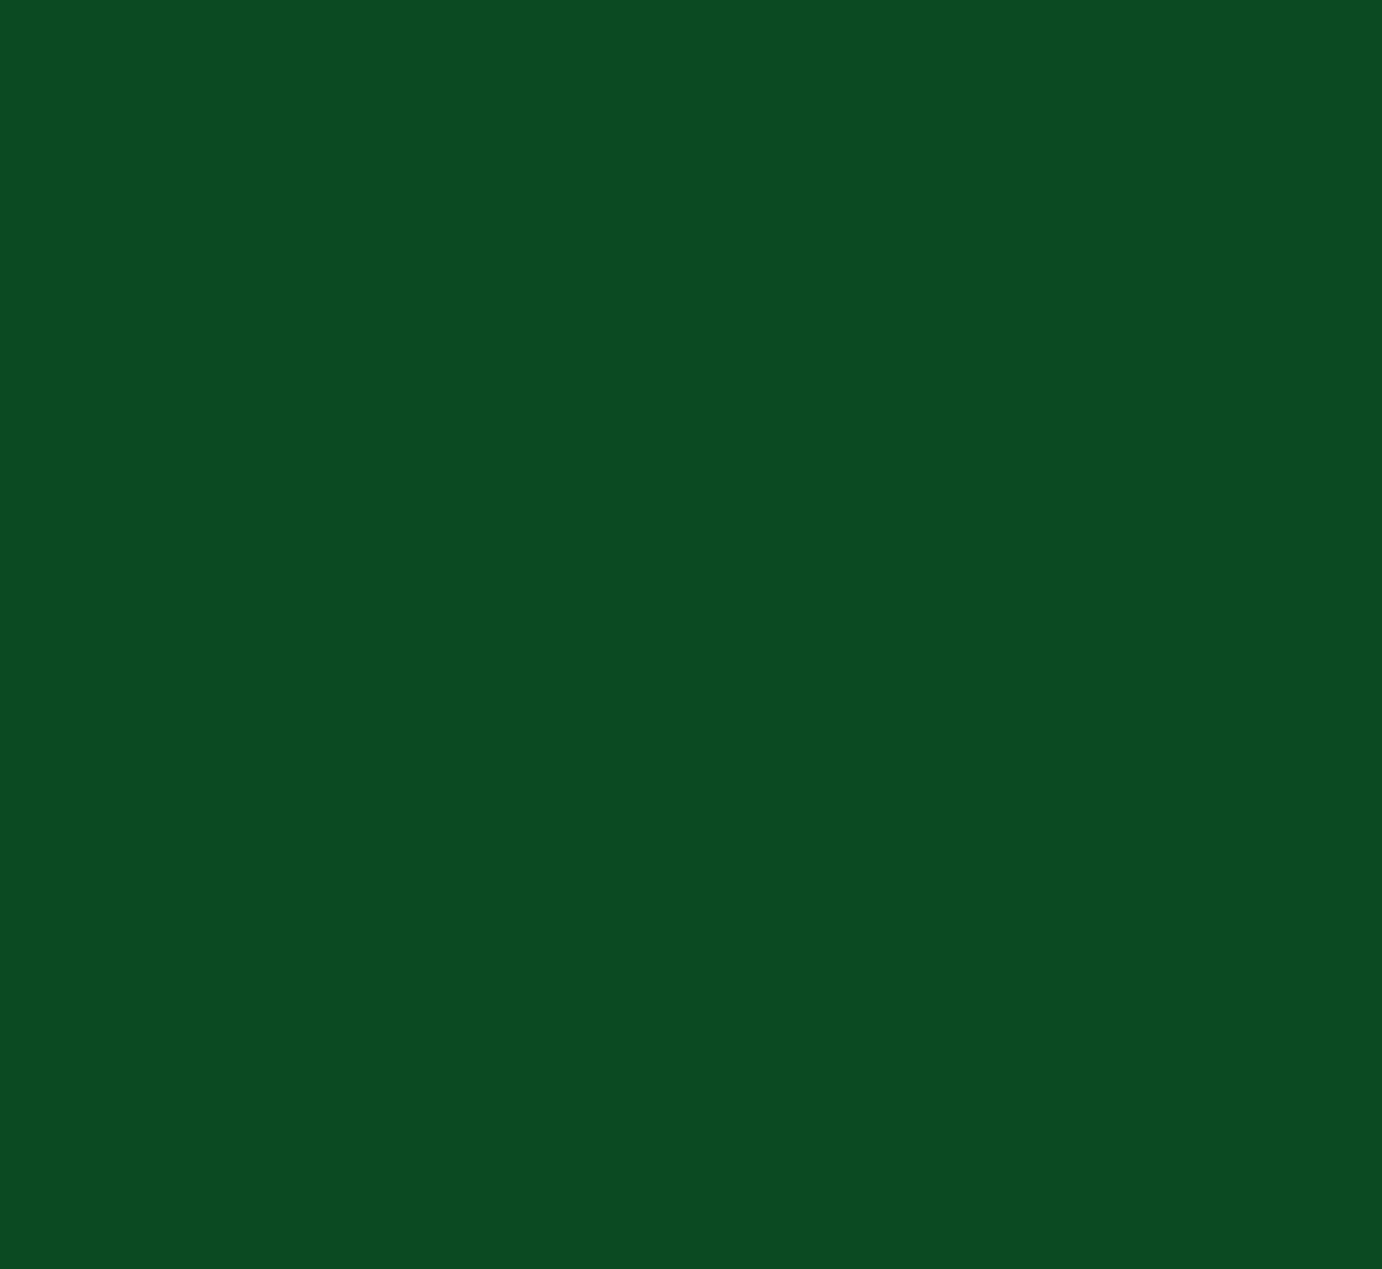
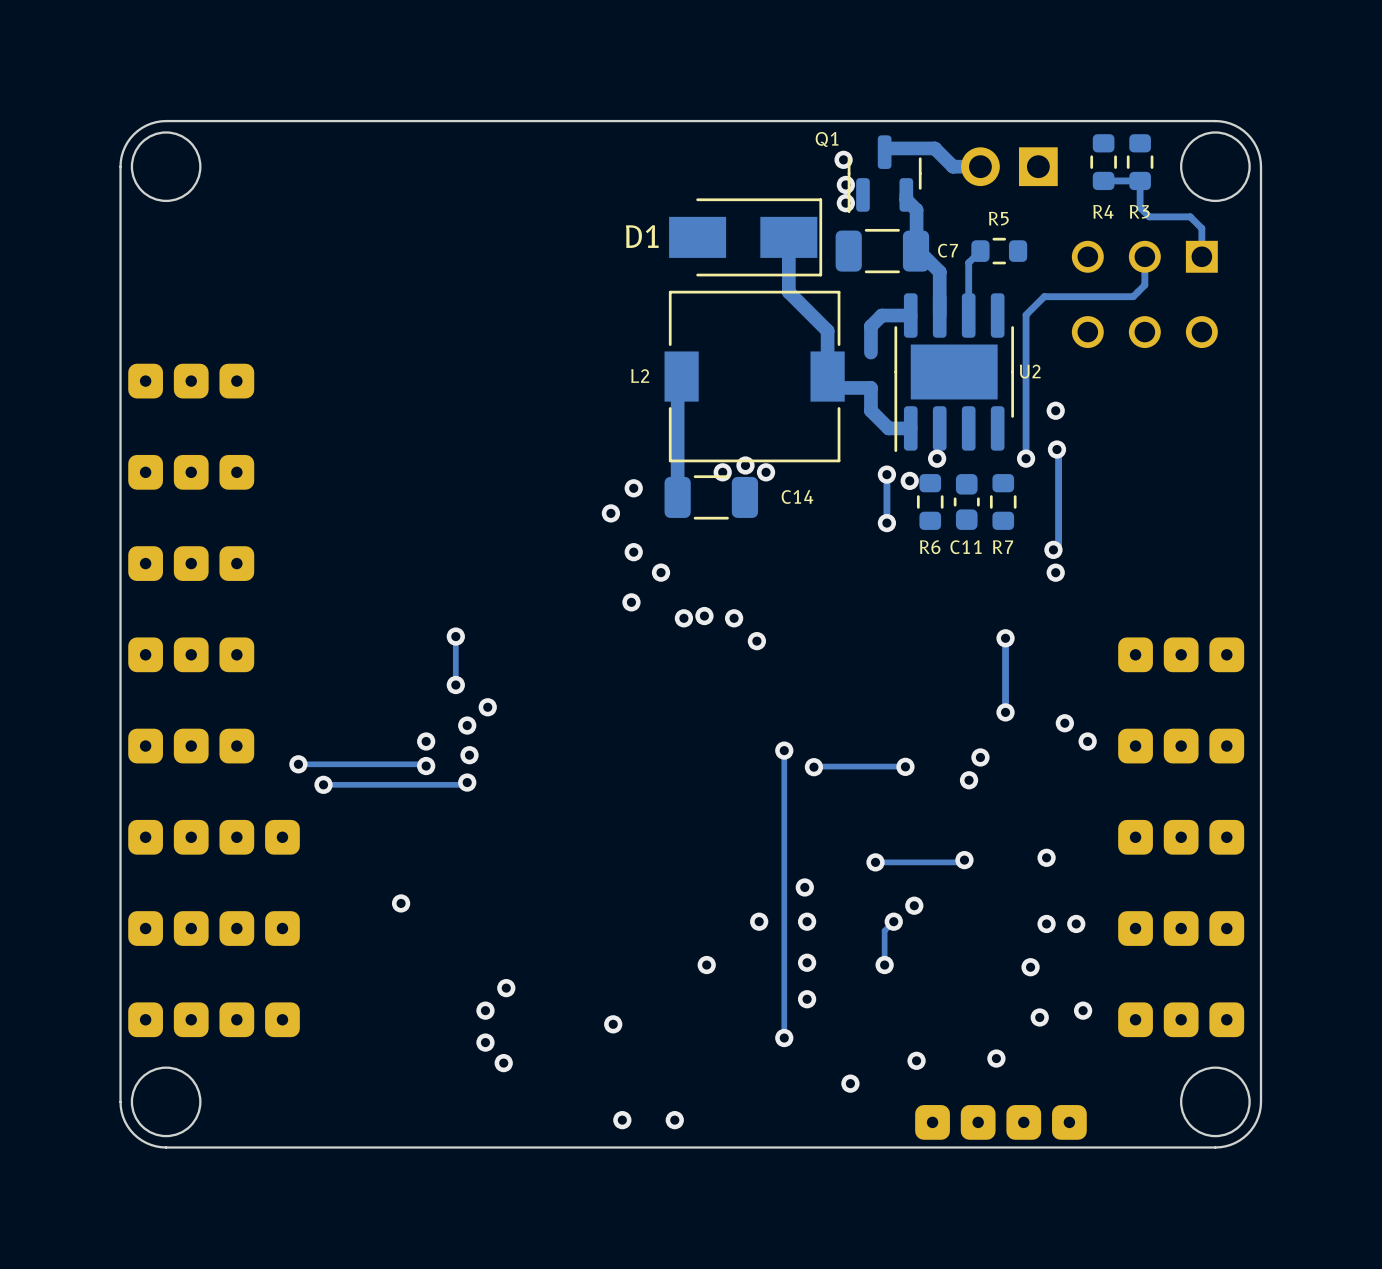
board edge: none -> (1215, 121) (166, 121) (151, 123) (133, 134) (123, 151) (120, 166) (120, 1101) (123, 1116) (133, 1134) (146, 1142) (166, 1147) (1215, 1147) (1230, 1144) (1247, 1134) (1258, 1116) (1261, 1101) (1261, 166) (1258, 151) (1247, 134) (1235, 125) (1215, 121)
round board edge: none -> [130, 131, 202, 203]
round board edge: none -> [1180, 131, 1251, 203]
track: none -> (884, 152) (888, 148) (934, 148) (953, 166) (980, 166)
via: none -> (843, 159)
R4: none -> (1103, 162)
R3: none -> (1140, 162)
part: none -> (1009, 166)
Q1: none -> (884, 174)
track: none -> (1103, 180) (1140, 180) (1140, 207) (1149, 216) (1190, 216) (1201, 228) (1201, 256)
via: none -> (845, 184)
track: none -> (906, 194) (906, 199) (916, 210) (916, 251) (918, 251) (939, 271) (939, 315)
via: none -> (845, 203)
D1: none -> (745, 237)
track: none -> (788, 237) (788, 292) (827, 330) (827, 376) (839, 387) (870, 387) (870, 410) (888, 428) (910, 428)
C7: none -> (882, 251)
track: none -> (980, 251) (968, 262) (968, 315)
R5: none -> (999, 251)
track: none -> (1144, 256) (1144, 285) (1133, 296) (1044, 296) (1026, 314) (1026, 458)
part: none -> (1144, 294)
track: none -> (910, 315) (881, 315) (870, 326) (870, 352)
U2: none -> (954, 372)
track: none -> (681, 376) (677, 380) (677, 497)
L2: none -> (754, 376)
part: none -> (191, 381)
via: none -> (1055, 410)
track: none -> (1056, 449) (1058, 451) (1058, 544) (1053, 549)
via: none -> (1056, 449)
via: none -> (937, 458)
via: none -> (1026, 458)
via: none -> (745, 465)
part: none -> (191, 472)
via: none -> (722, 472)
via: none -> (766, 472)
track: none -> (886, 474) (886, 523)
via: none -> (886, 474)
via: none -> (909, 480)
via: none -> (633, 488)
C14: none -> (711, 497)
R6: none -> (930, 501)
C11: none -> (966, 501)
R7: none -> (1003, 501)
via: none -> (610, 513)
via: none -> (886, 523)
via: none -> (1053, 549)
via: none -> (633, 552)
part: none -> (191, 563)
via: none -> (661, 572)
via: none -> (1055, 572)
via: none -> (631, 602)
via: none -> (704, 616)
via: none -> (683, 618)
via: none -> (734, 618)
track: none -> (455, 636) (455, 685)
via: none -> (455, 636)
track: none -> (1005, 638) (1005, 712)
via: none -> (1005, 638)
via: none -> (756, 641)
part: none -> (191, 654)
part: none -> (1181, 654)
via: none -> (455, 685)
via: none -> (487, 707)
via: none -> (1005, 712)
via: none -> (1064, 723)
via: none -> (467, 725)
via: none -> (426, 741)
via: none -> (1087, 741)
part: none -> (191, 746)
part: none -> (1181, 746)
track: none -> (784, 750) (784, 1038)
via: none -> (784, 750)
via: none -> (469, 755)
via: none -> (980, 757)
track: none -> (298, 764) (424, 764) (426, 766)
via: none -> (298, 764)
via: none -> (426, 766)
track: none -> (905, 766) (813, 767)
via: none -> (905, 766)
via: none -> (813, 767)
via: none -> (969, 780)
track: none -> (467, 782) (464, 784) (323, 784)
via: none -> (467, 782)
via: none -> (323, 784)
part: none -> (214, 837)
part: none -> (1181, 837)
via: none -> (1046, 857)
track: none -> (964, 860) (962, 862) (875, 862)
via: none -> (964, 860)
via: none -> (875, 862)
via: none -> (804, 887)
via: none -> (401, 903)
via: none -> (914, 905)
via: none -> (759, 921)
via: none -> (807, 921)
track: none -> (893, 921) (884, 930) (884, 965)
via: none -> (893, 921)
via: none -> (1046, 923)
via: none -> (1076, 923)
part: none -> (214, 928)
part: none -> (1181, 928)
via: none -> (807, 962)
via: none -> (706, 965)
via: none -> (884, 965)
via: none -> (1030, 967)
via: none -> (506, 988)
via: none -> (807, 999)
via: none -> (485, 1010)
via: none -> (1083, 1010)
via: none -> (1039, 1017)
part: none -> (214, 1019)
part: none -> (1181, 1019)
via: none -> (613, 1024)
via: none -> (784, 1038)
via: none -> (485, 1042)
via: none -> (996, 1058)
via: none -> (916, 1060)
via: none -> (503, 1063)
round board edge: none -> [130, 1066, 202, 1138]
round board edge: none -> [1180, 1066, 1251, 1138]
via: none -> (850, 1083)
via: none -> (622, 1120)
via: none -> (674, 1120)
part: none -> (1000, 1122)

